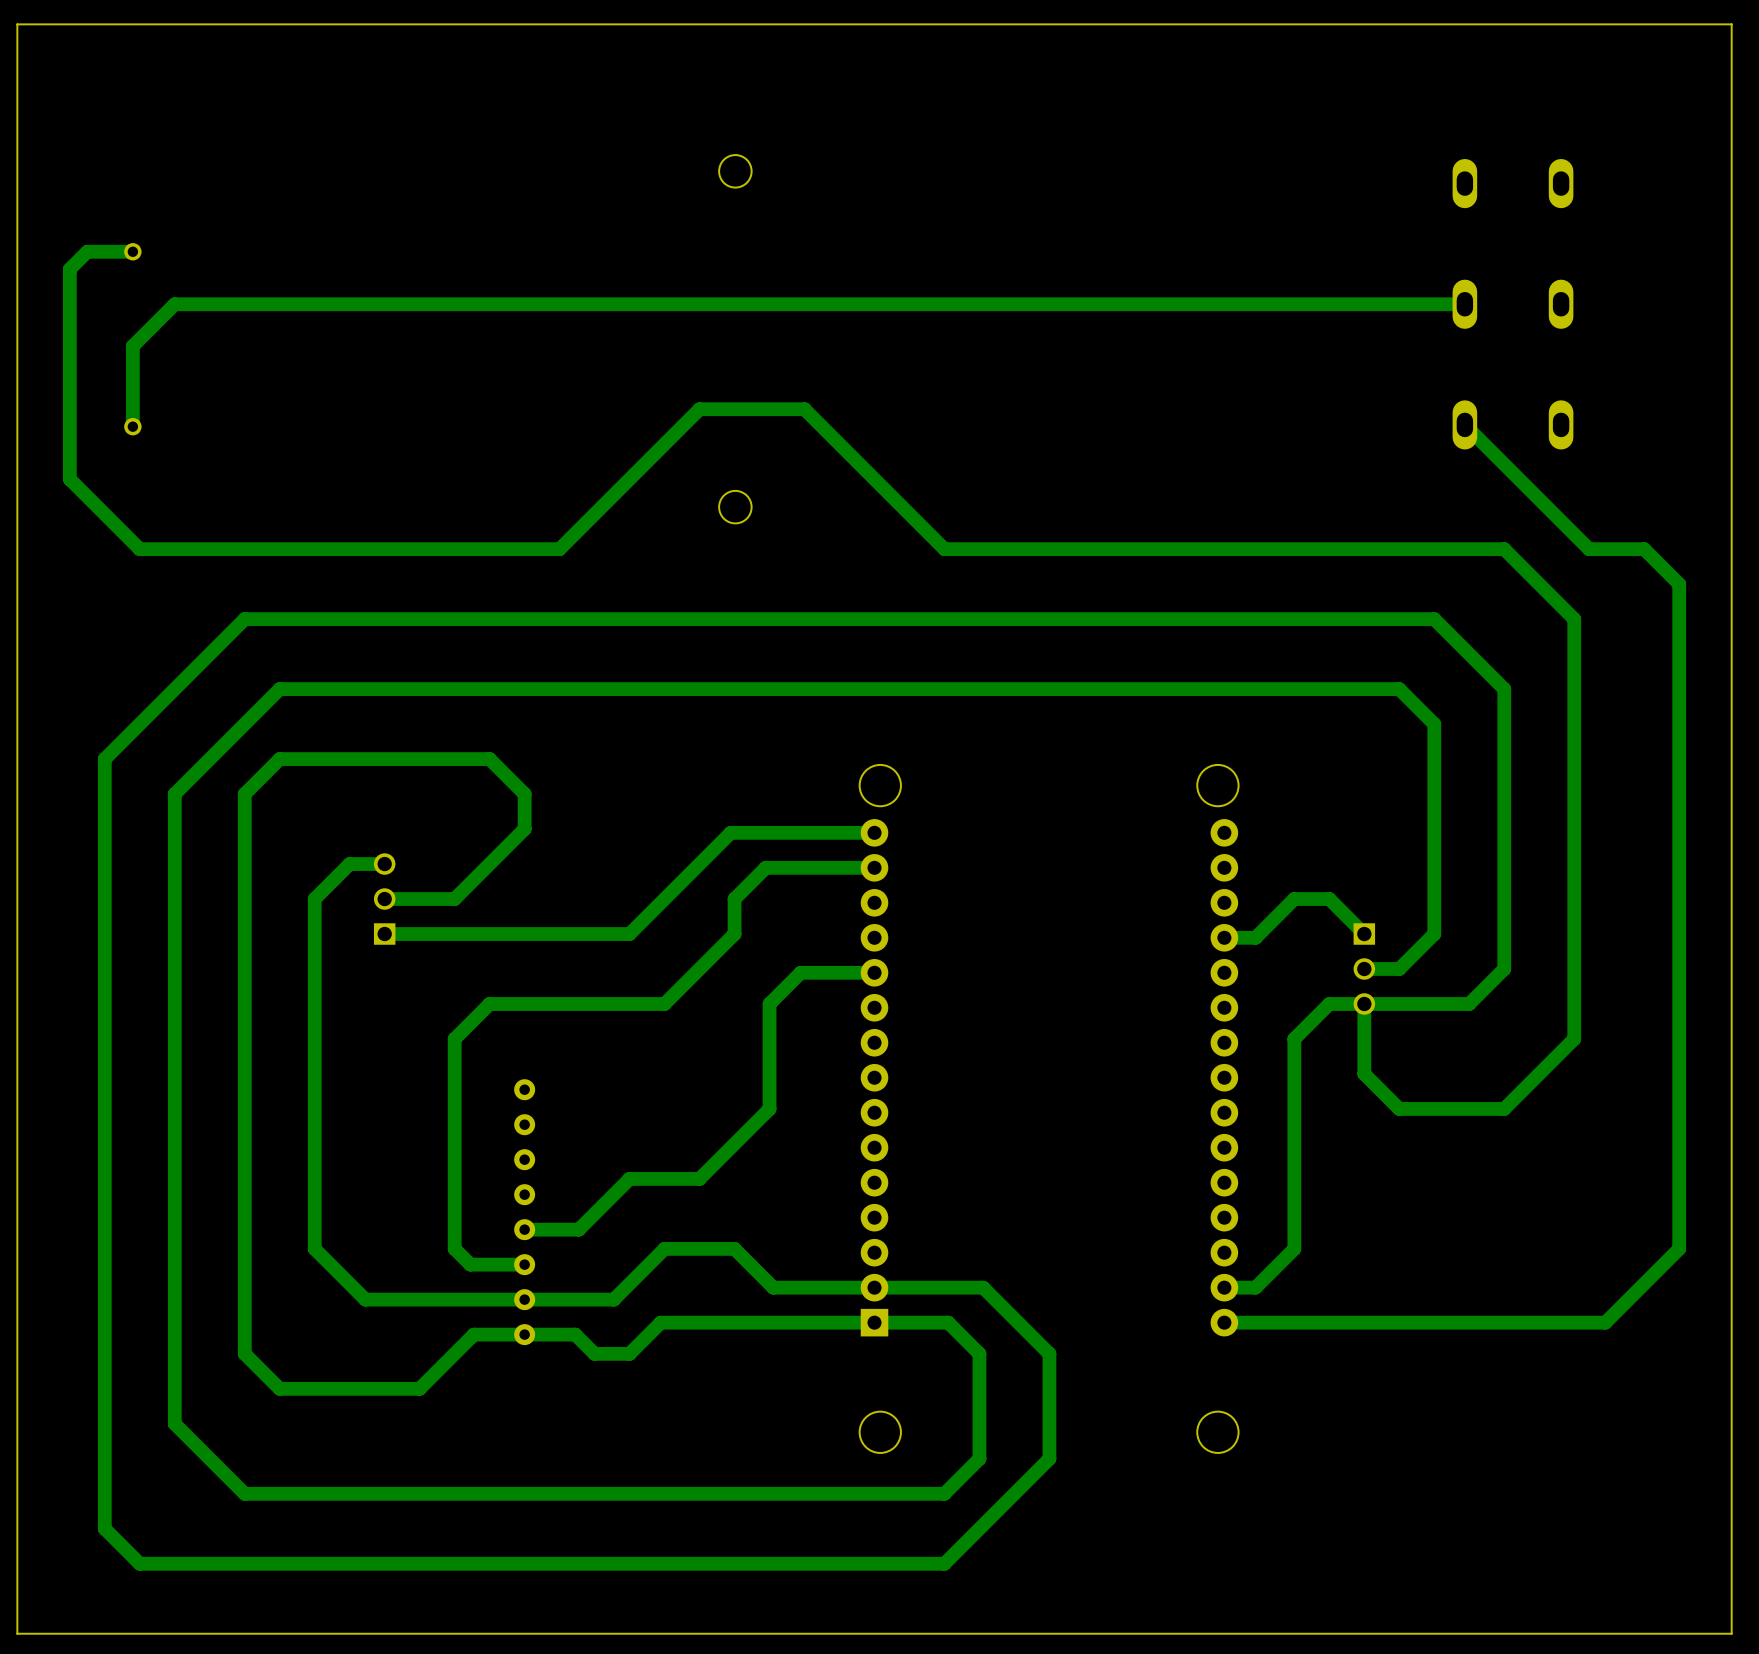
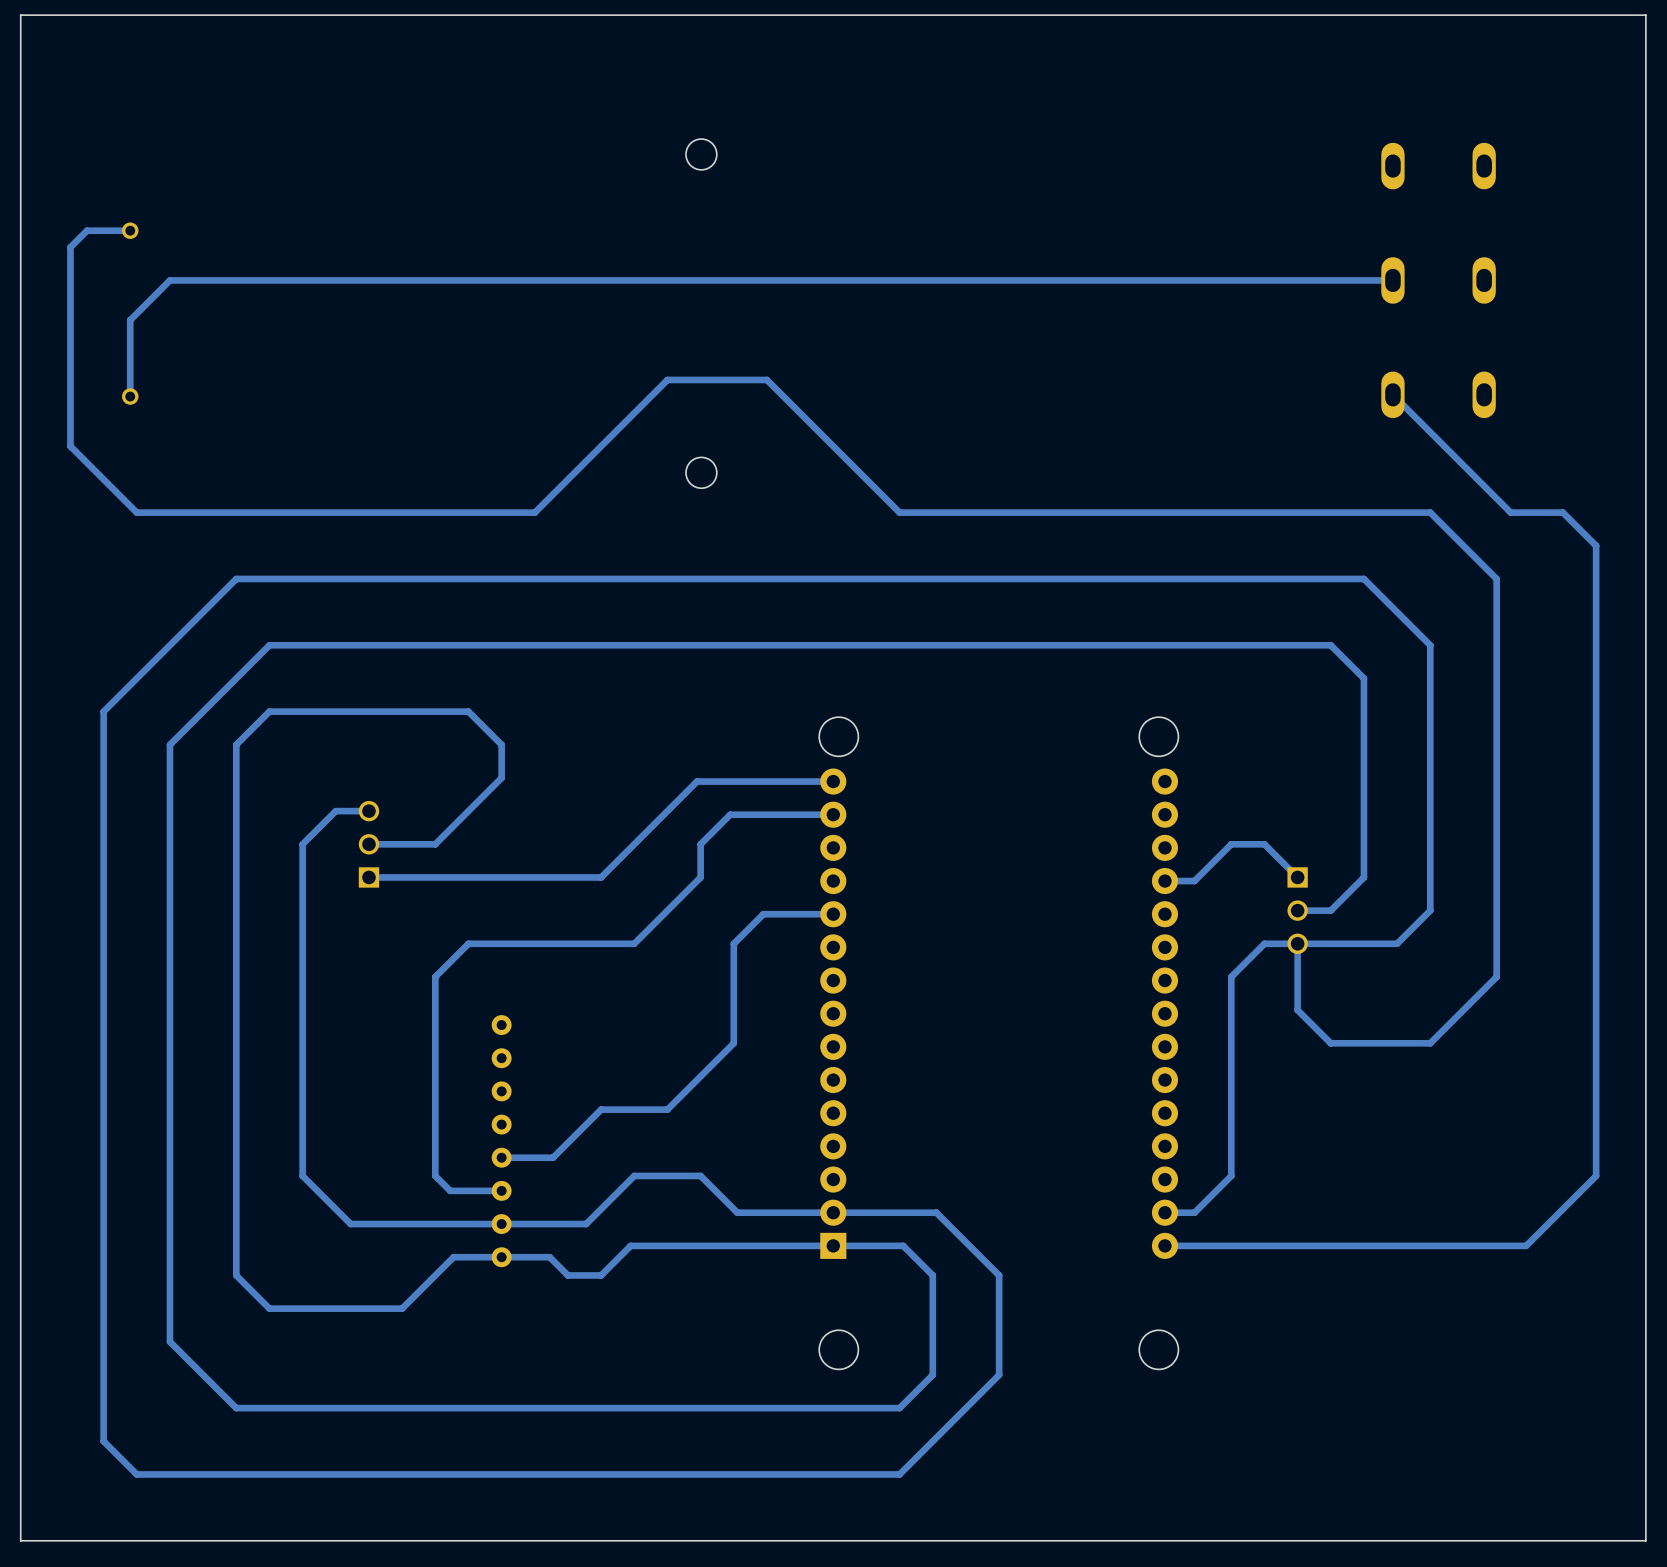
bottom track width: thick (132, 251) (87, 251) (69, 269) (69, 479) (139, 549) (559, 549) (699, 409) (804, 409) (944, 549) (1504, 549) (1574, 619) (1574, 1038) (1504, 1108) (1399, 1108) (1364, 1073) (1364, 1003) -> thin (130, 230) (87, 230) (70, 247) (70, 446) (136, 512) (534, 512) (667, 379) (766, 379) (899, 512) (1430, 512) (1496, 578) (1496, 976) (1430, 1043) (1330, 1043) (1297, 1010) (1297, 943)
bottom track width: thick (1464, 304) (174, 304) (132, 346) (132, 426) -> thin (1392, 280) (169, 280) (130, 320) (130, 396)
bottom track width: thick (1464, 424) (1589, 549) (1644, 549) (1679, 584) (1679, 1248) (1605, 1322) (1224, 1322) -> thin (1392, 394) (1510, 512) (1562, 512) (1596, 545) (1596, 1175) (1526, 1245) (1164, 1245)
bottom track width: thick (874, 832) (730, 832) (629, 934) (384, 934) -> thin (833, 781) (697, 781) (601, 877) (368, 877)
bottom track width: thick (384, 864) (349, 864) (314, 899) (314, 1248) (365, 1299) (613, 1299) (664, 1248) (734, 1248) (773, 1287) (983, 1287) (1049, 1353) (1049, 1458) (944, 1563) (139, 1563) (104, 1528) (104, 759) (244, 619) (1434, 619) (1504, 689) (1504, 969) (1469, 1003) (1329, 1003) (1294, 1038) (1294, 1248) (1255, 1287) (1224, 1287) -> thin (368, 811) (335, 811) (302, 844) (302, 1175) (350, 1224) (586, 1224) (634, 1175) (700, 1175) (737, 1212) (936, 1212) (999, 1275) (999, 1374) (899, 1474) (136, 1474) (103, 1441) (103, 711) (236, 578) (1363, 578) (1430, 645) (1430, 910) (1397, 943) (1264, 943) (1231, 976) (1231, 1175) (1194, 1212) (1164, 1212)
bottom track width: thick (874, 867) (765, 867) (734, 899) (734, 934) (664, 1003) (489, 1003) (454, 1038) (454, 1248) (470, 1264) (524, 1264) -> thin (833, 814) (730, 814) (700, 844) (700, 877) (634, 943) (468, 943) (435, 976) (435, 1175) (450, 1190) (501, 1190)
bottom track width: thick (384, 899) (454, 899) (524, 829) (524, 794) (489, 759) (279, 759) (244, 794) (244, 1353) (279, 1388) (419, 1388) (473, 1334) (575, 1334) (594, 1353) (629, 1353) (660, 1322) (948, 1322) (979, 1353) (979, 1458) (944, 1493) (244, 1493) (174, 1423) (174, 794) (279, 689) (1399, 689) (1434, 724) (1434, 934) (1399, 969) (1364, 969) -> thin (368, 844) (435, 844) (501, 777) (501, 744) (468, 711) (269, 711) (236, 744) (236, 1275) (269, 1308) (402, 1308) (453, 1257) (549, 1257) (567, 1275) (601, 1275) (630, 1245) (903, 1245) (932, 1275) (932, 1374) (899, 1408) (236, 1408) (169, 1341) (169, 744) (269, 645) (1330, 645) (1363, 678) (1363, 877) (1330, 910) (1297, 910)
bottom track width: thick (1364, 934) (1329, 899) (1294, 899) (1255, 937) (1224, 937) -> thin (1297, 877) (1264, 844) (1231, 844) (1194, 881) (1164, 881)
bottom track width: thick (874, 972) (800, 972) (769, 1003) (769, 1108) (699, 1178) (629, 1178) (578, 1229) (524, 1229) -> thin (833, 914) (763, 914) (733, 943) (733, 1043) (667, 1109) (601, 1109) (553, 1157) (501, 1157)

